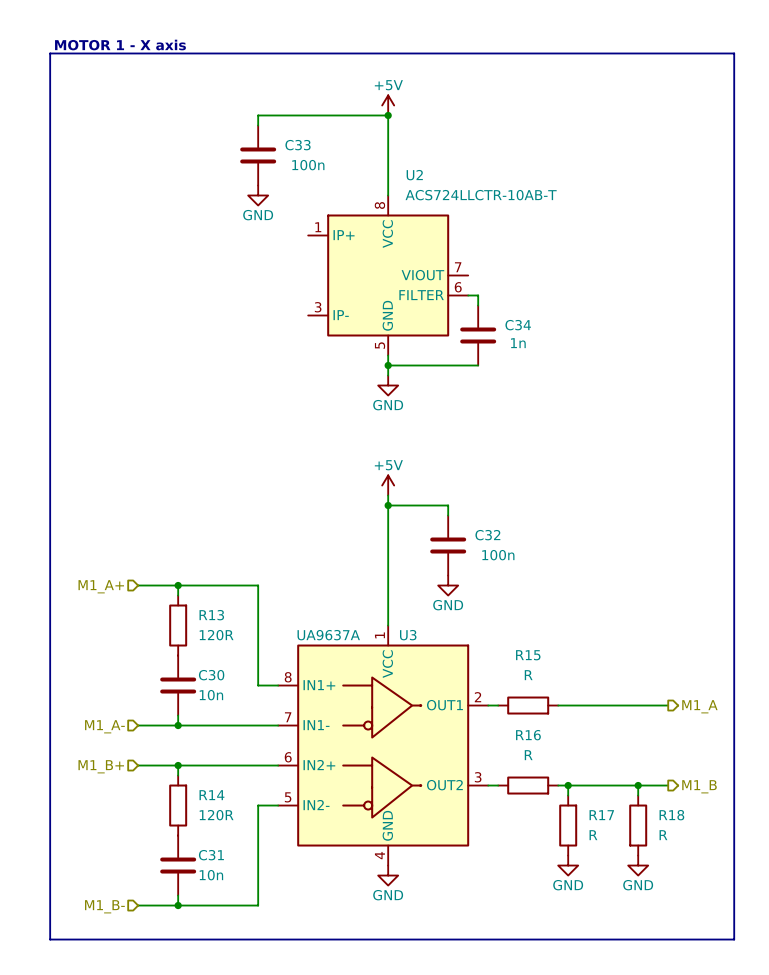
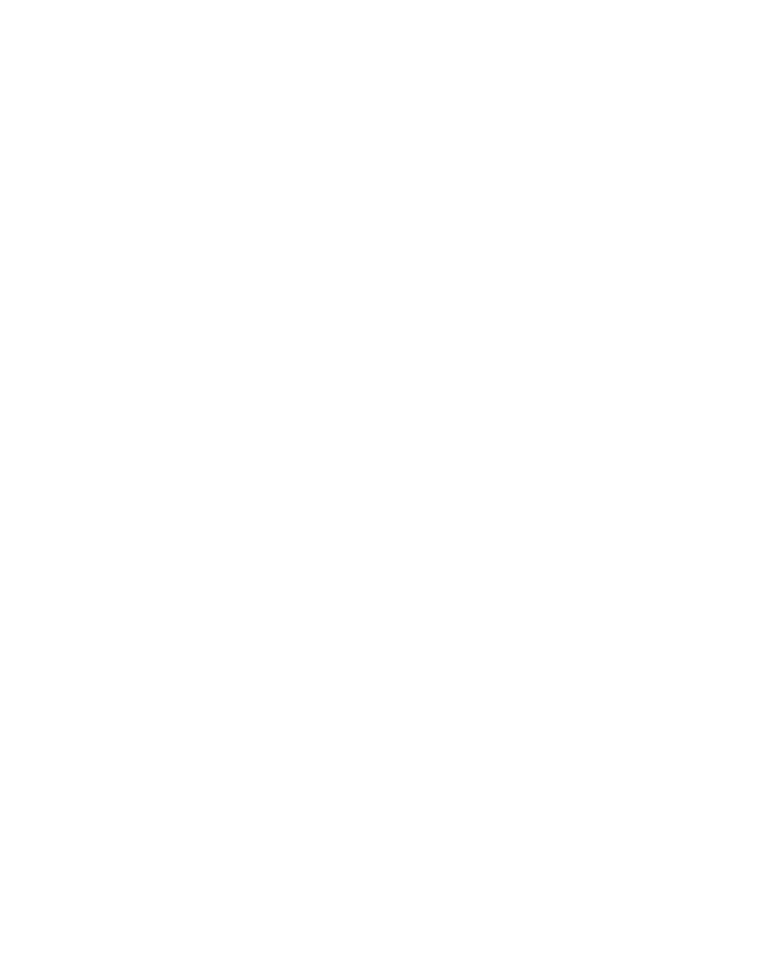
text: MOTOR 1 - X axis (120, 45) -> none
line: (50, 53) (50, 939) (734, 939) (734, 53) (50, 53) -> none
power symbol: +5V (388, 105) -> none
junction: (388, 115) -> none
wire: (258, 125) (258, 115) (388, 115) (388, 195) -> none
C33: 100n (258, 155) -> none
power symbol: GND (258, 195) -> none
U2: ACS724LLCTR-10AB-T (388, 275) -> none
wire: (468, 295) (478, 295) (478, 305) -> none
C34: 1n (478, 335) -> none
wire: (388, 355) (388, 375) -> none
wire: (388, 365) (478, 365) -> none
junction: (388, 365) -> none
power symbol: GND (388, 385) -> none
power symbol: +5V (388, 485) -> none
wire: (388, 495) (388, 625) -> none
wire: (388, 505) (448, 505) (448, 515) -> none
junction: (388, 505) -> none
C32: 100n (448, 545) -> none
wire: (138, 585) (258, 585) (258, 685) (278, 685) -> none
wire: (178, 585) (178, 595) -> none
junction: (178, 585) -> none
power symbol: GND (448, 585) -> none
hierarchical label: M1_A+ (101, 586) -> none
R13: 120R (178, 625) -> none
C30: 10n (178, 685) -> none
wire: (488, 705) (498, 705) -> none
R15: R (528, 705) -> none
wire: (558, 705) (668, 705) -> none
hierarchical label: M1_A (699, 706) -> none
wire: (178, 715) (178, 725) -> none
wire: (138, 725) (278, 725) -> none
junction: (178, 725) -> none
hierarchical label: M1_A- (104, 726) -> none
U3: UA9637A (383, 745) -> none
wire: (138, 765) (278, 765) -> none
wire: (178, 765) (178, 775) -> none
junction: (178, 765) -> none
hierarchical label: M1_B+ (101, 766) -> none
wire: (488, 785) (498, 785) -> none
R16: R (528, 785) -> none
wire: (558, 785) (668, 785) -> none
wire: (568, 785) (568, 795) -> none
junction: (568, 785) -> none
wire: (638, 785) (638, 795) -> none
junction: (638, 785) -> none
hierarchical label: M1_B (699, 786) -> none
R14: 120R (178, 805) -> none
wire: (278, 805) (258, 805) (258, 905) (138, 905) -> none
R17: R (568, 825) -> none
R18: R (638, 825) -> none
C31: 10n (178, 865) -> none
power symbol: GND (568, 865) -> none
power symbol: GND (638, 865) -> none
power symbol: GND (388, 875) -> none
wire: (178, 895) (178, 905) -> none
junction: (178, 905) -> none
hierarchical label: M1_B- (104, 906) -> none

